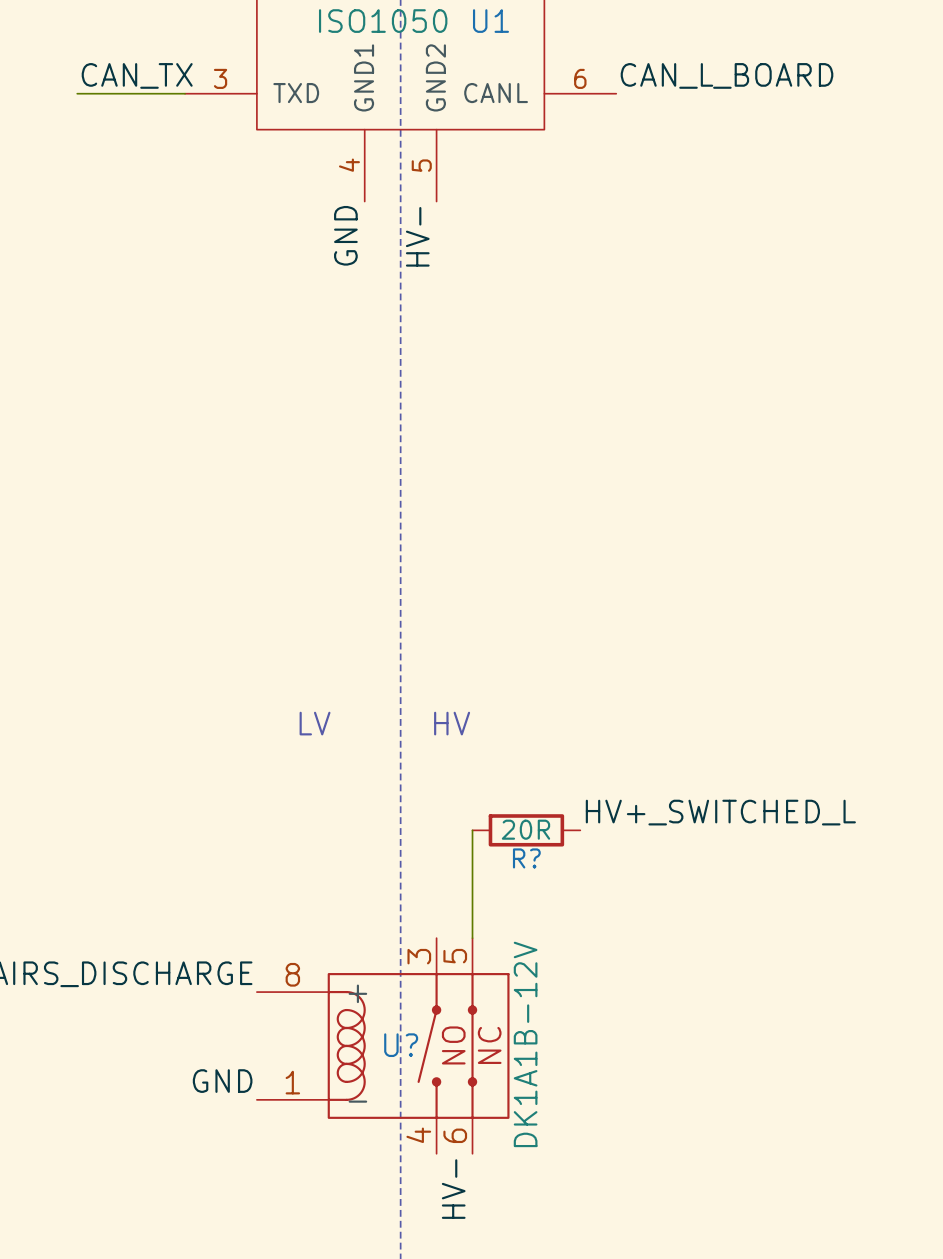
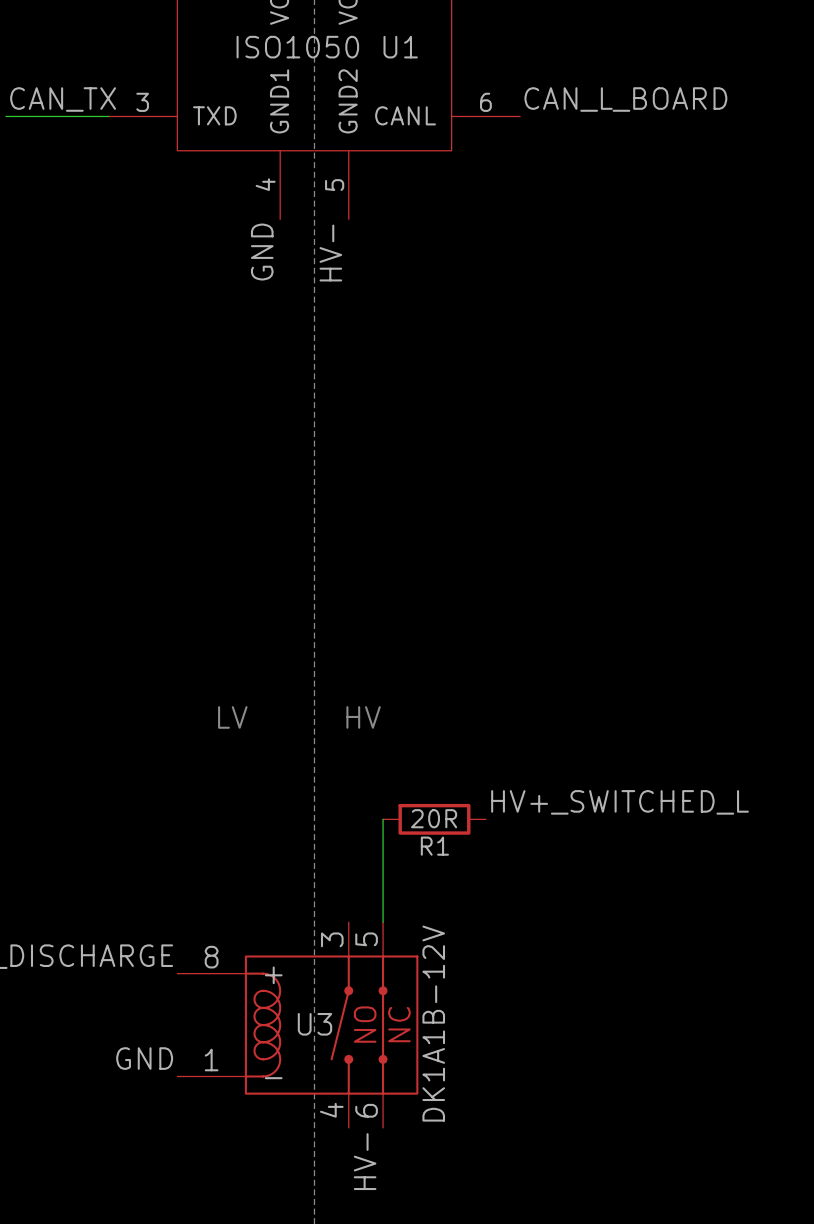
R? name: R? (526, 858) -> R1 (434, 846)
U? name: U? (401, 1045) -> U3 (314, 1024)

